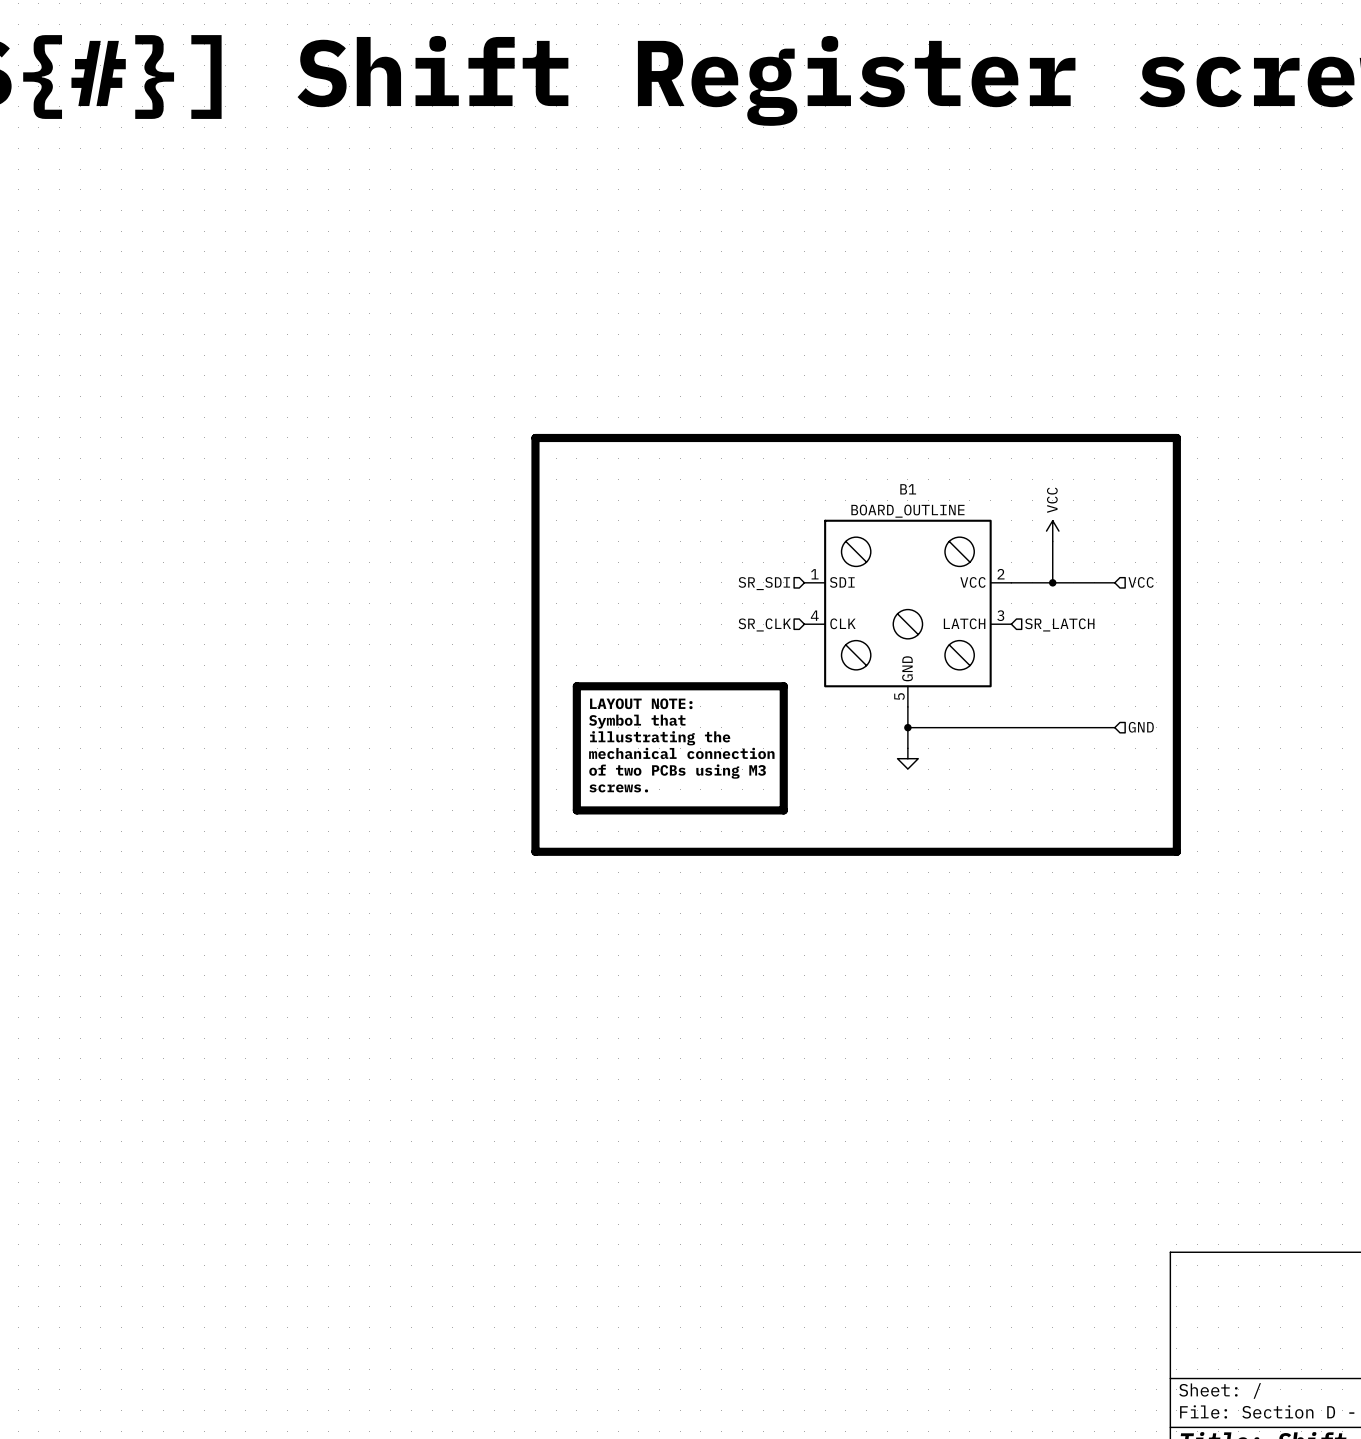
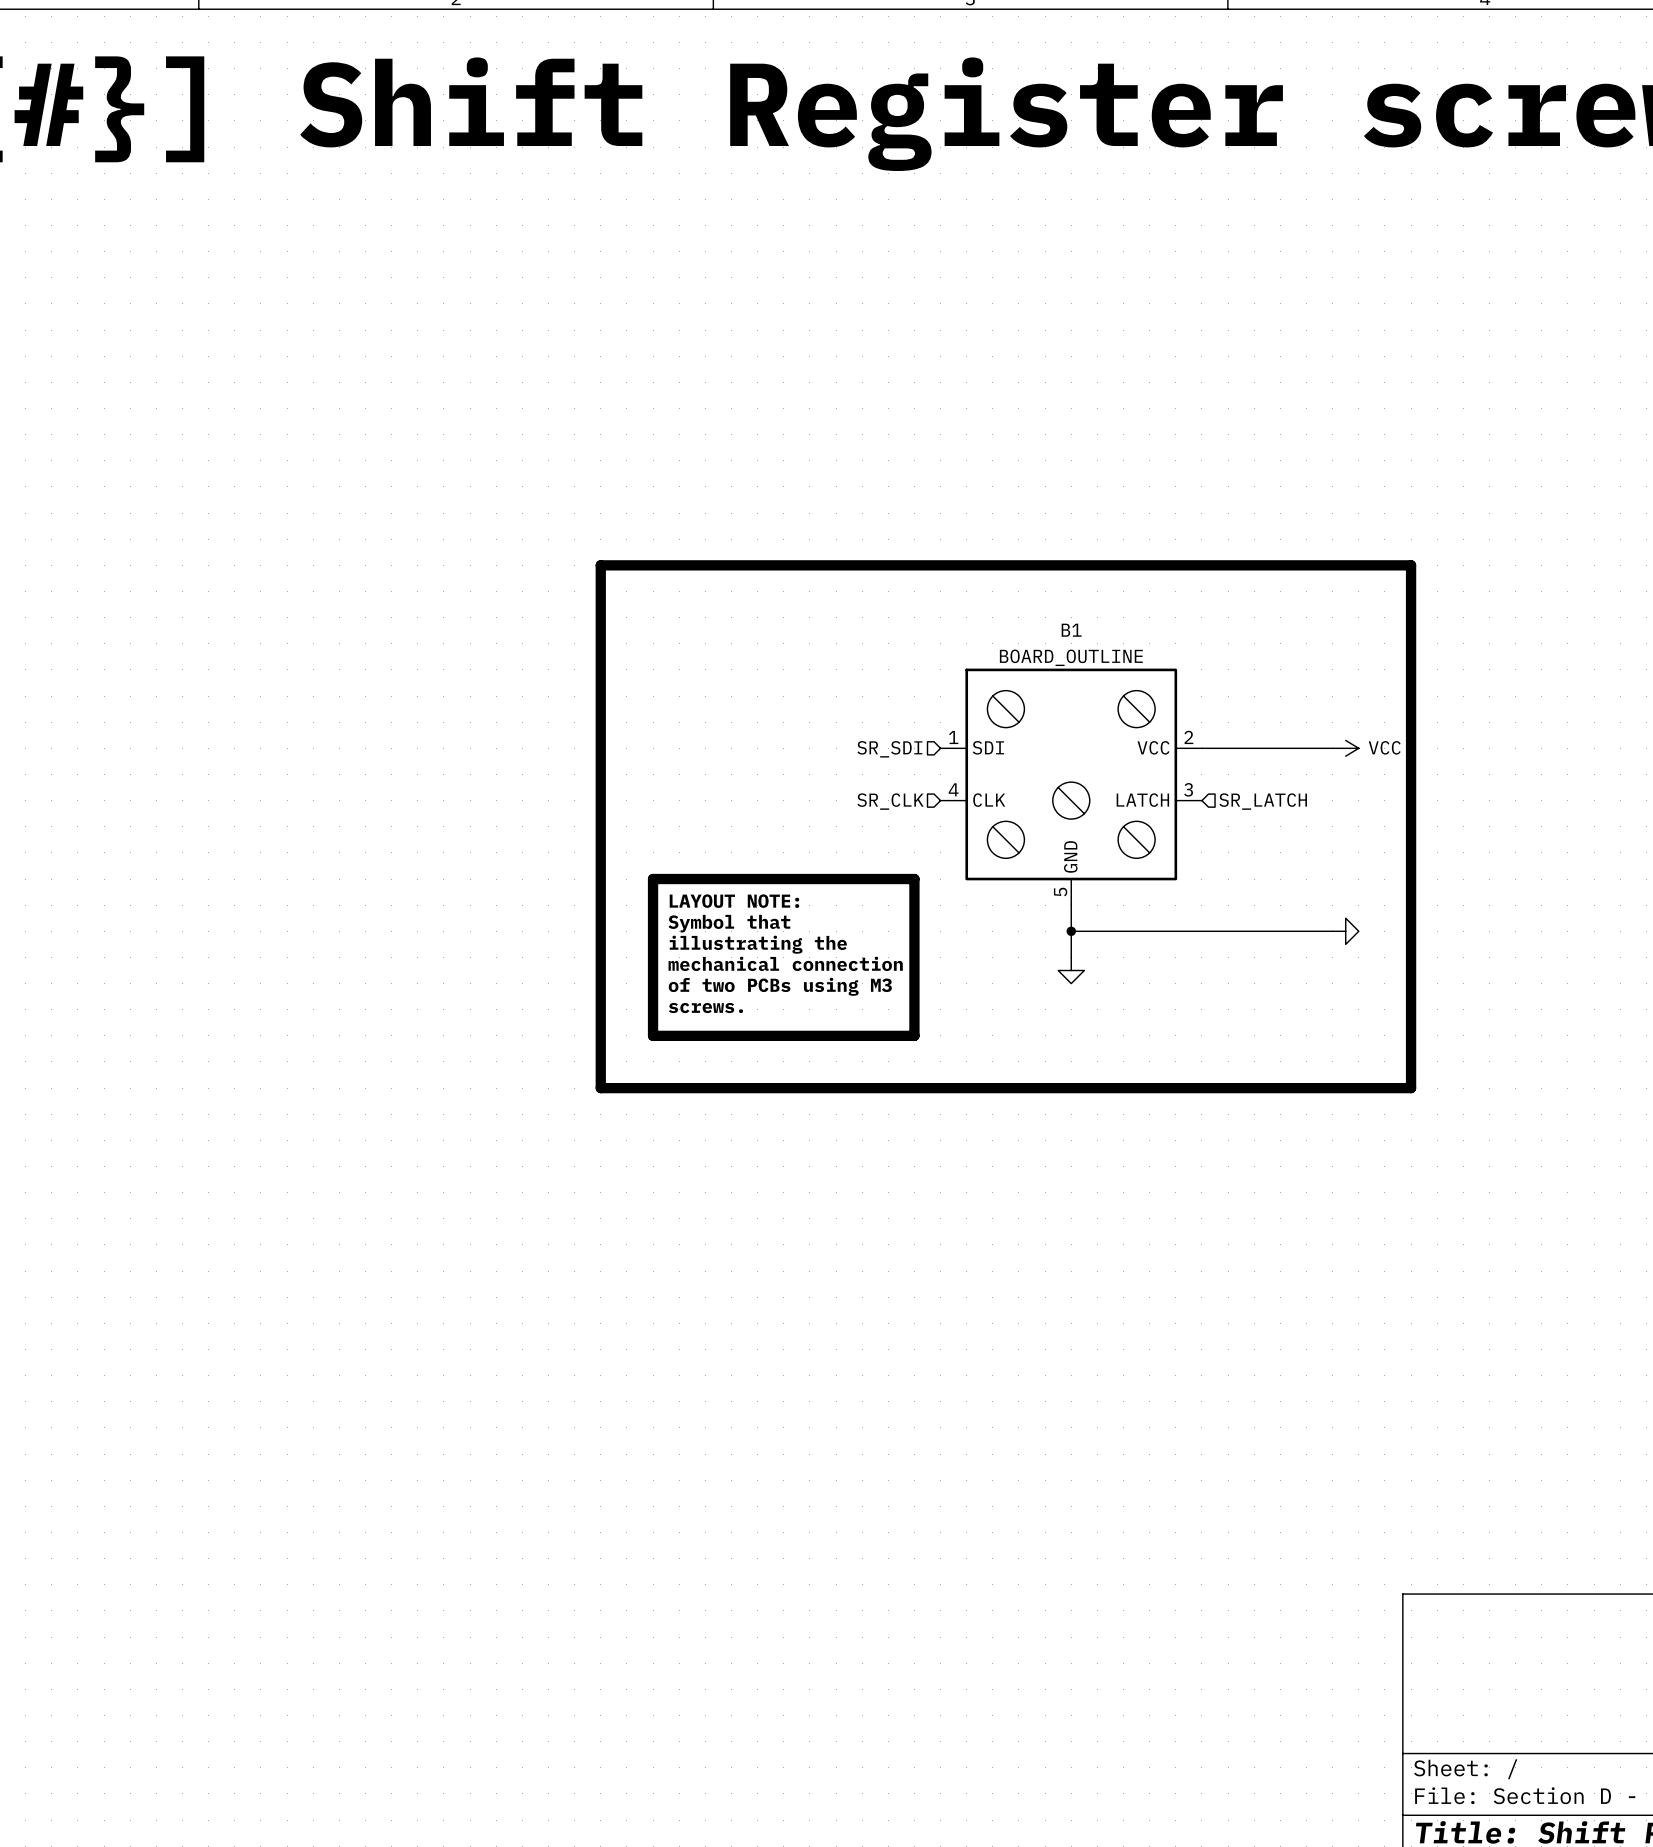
power symbol rotation: 0° (1052, 531) -> 90° clockwise (1345, 748)
power symbol position: VCC (1052, 531) -> VCC (1345, 748)
wire: (1052, 541) (1052, 582) -> none
junction: (1052, 582) -> none
hierarchical label: VCC (1141, 582) -> none
power symbol: none -> (1345, 931)
hierarchical label: GND (1141, 727) -> none

